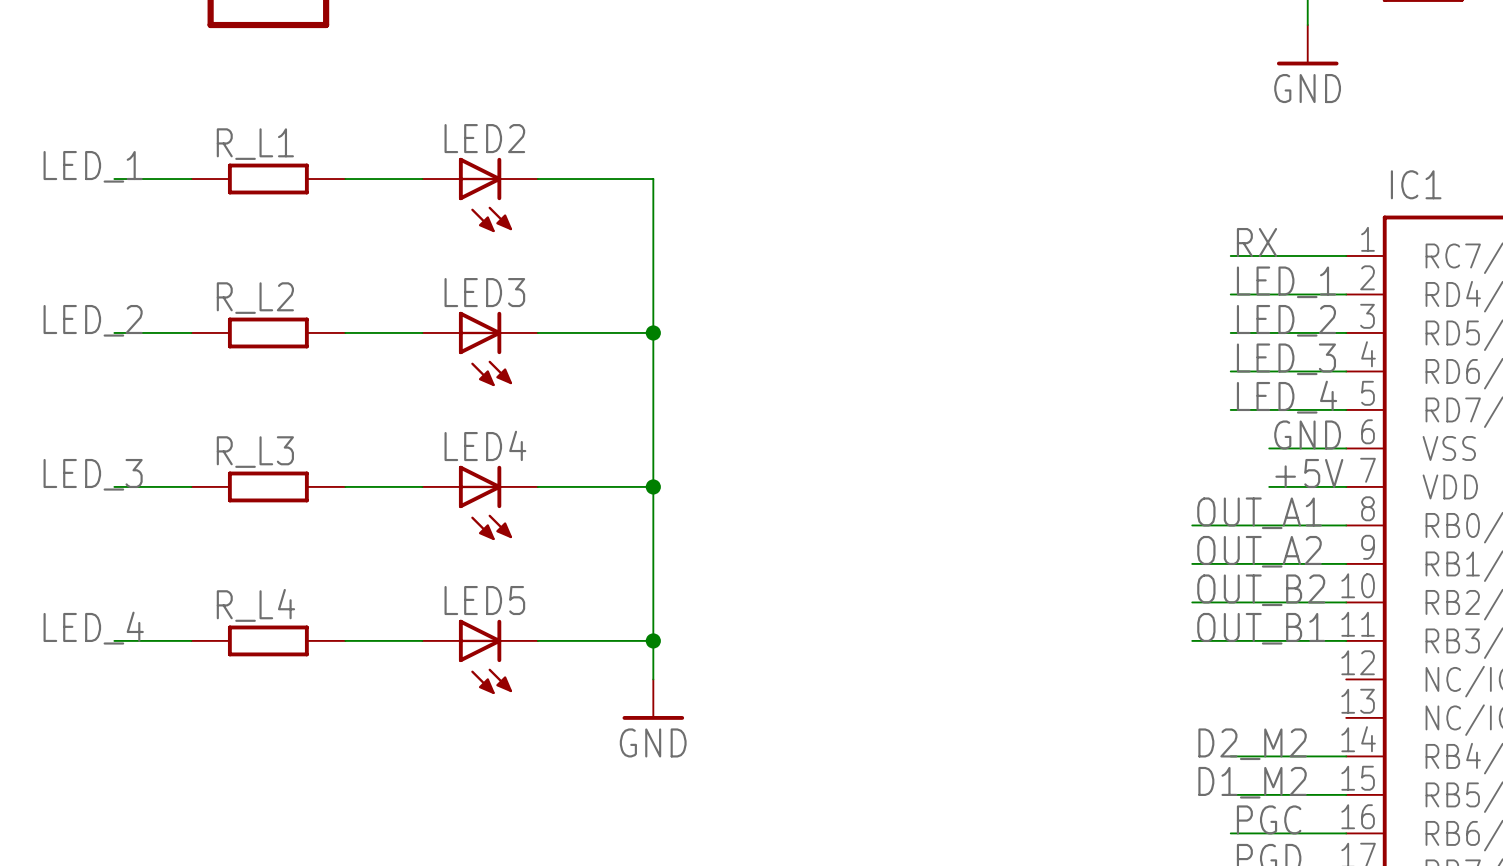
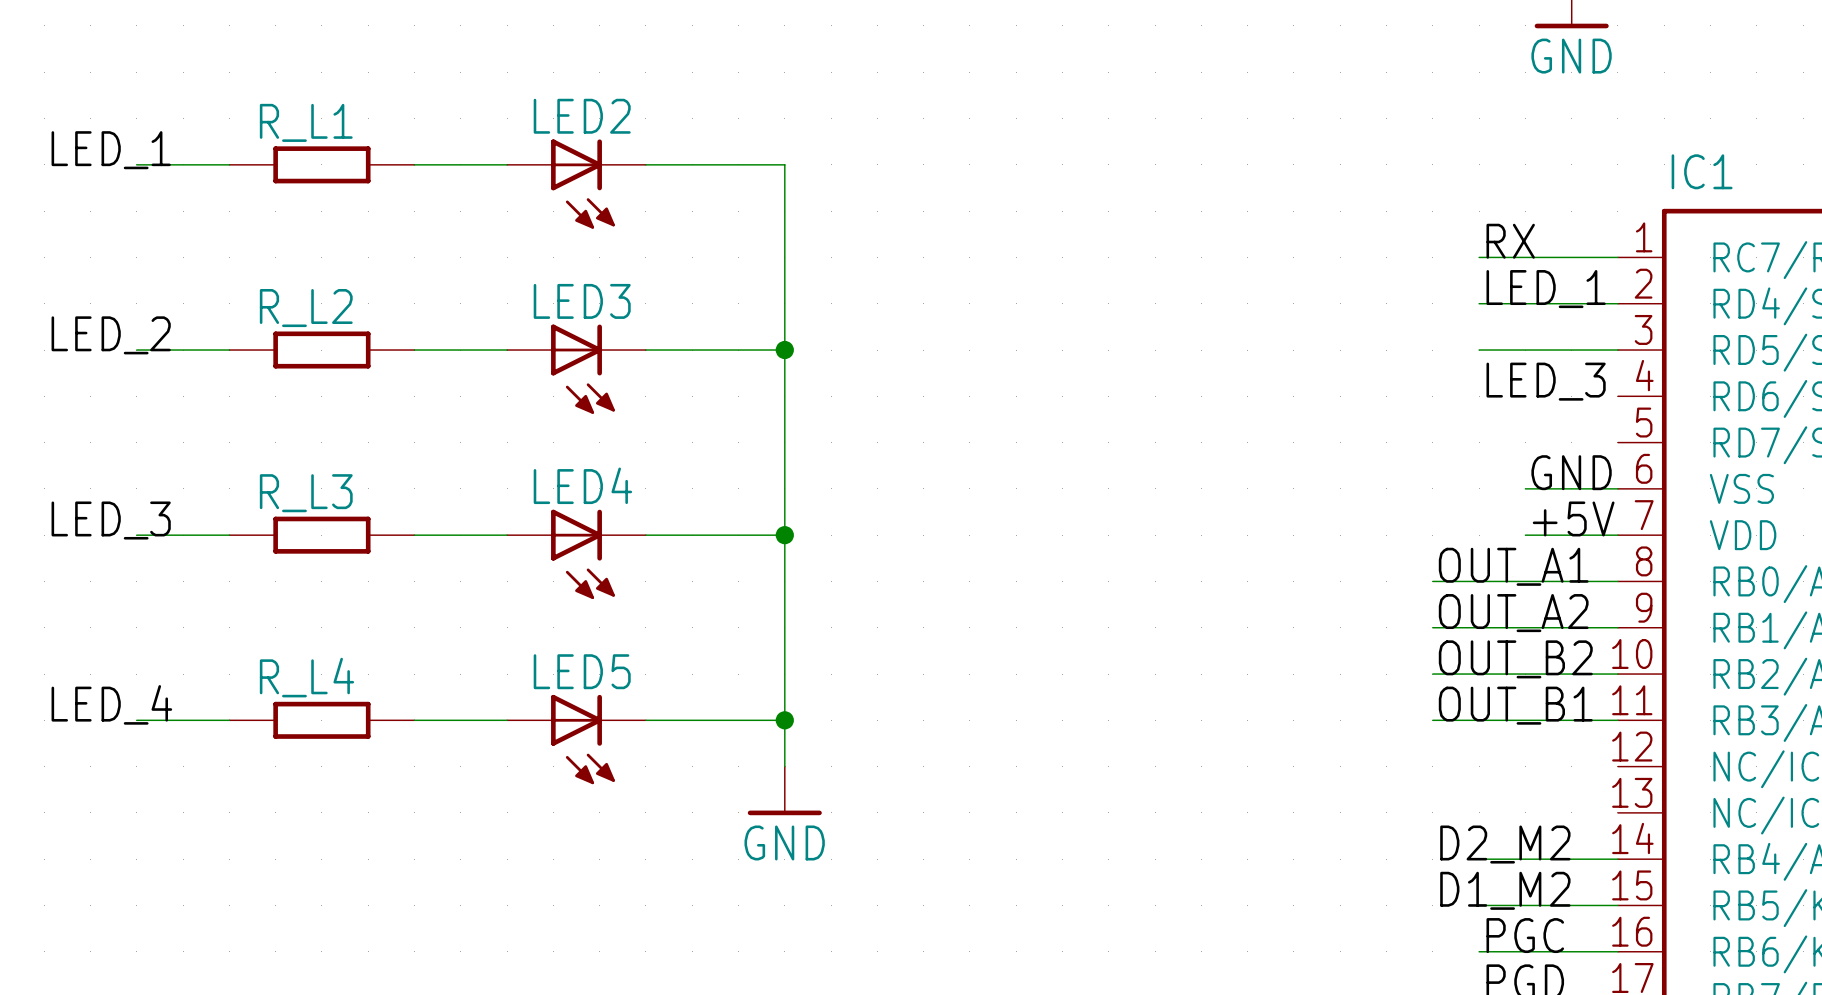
label: LED_2 (1286, 320) -> none
wire: (1230, 371) (1346, 371) -> none
label: LED_4 (1287, 397) -> none
wire: (1230, 409) (1346, 409) -> none

